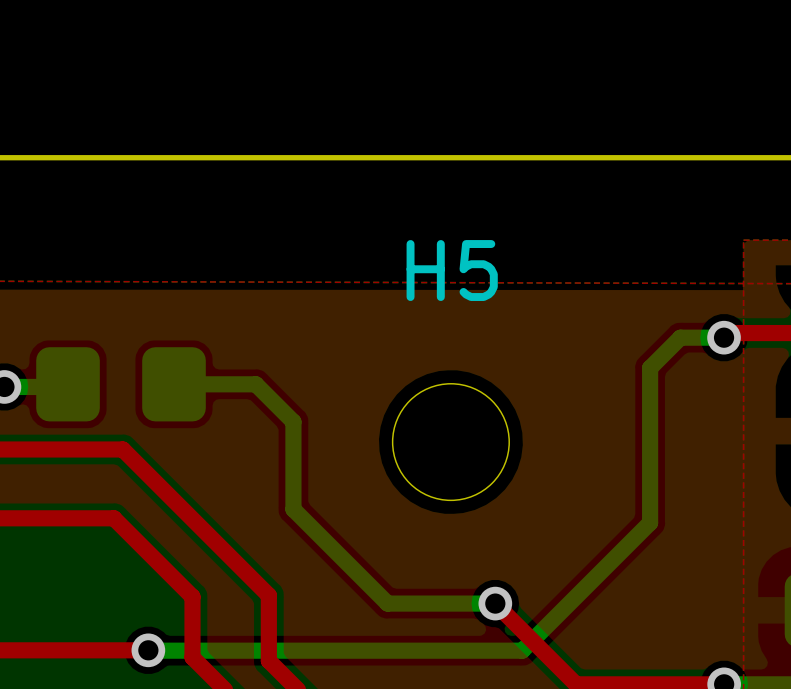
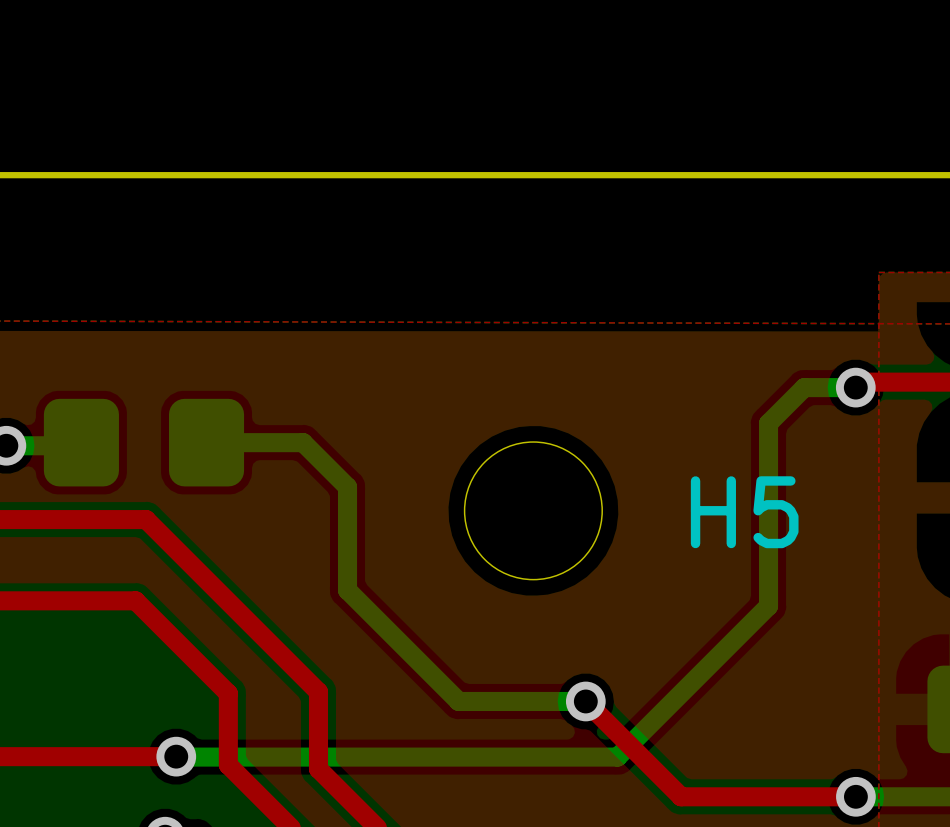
H5 name position: H5 (452, 270) -> H5 (744, 512)

